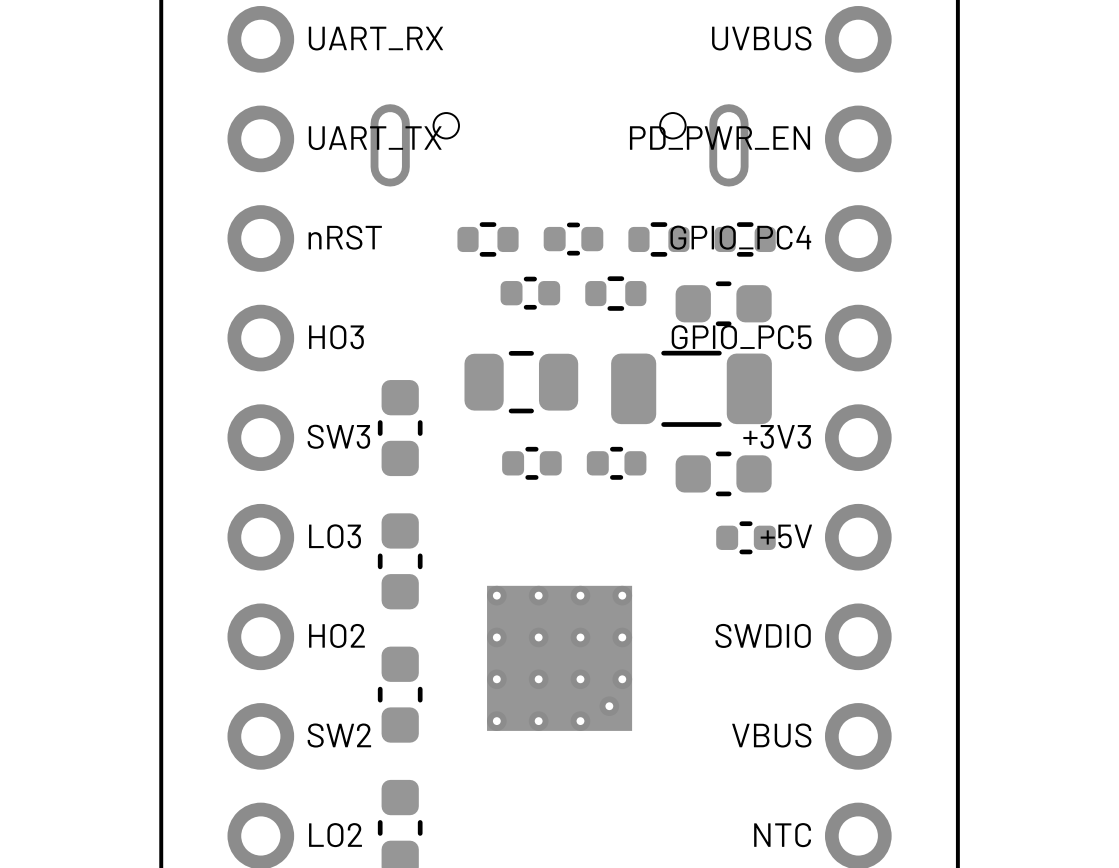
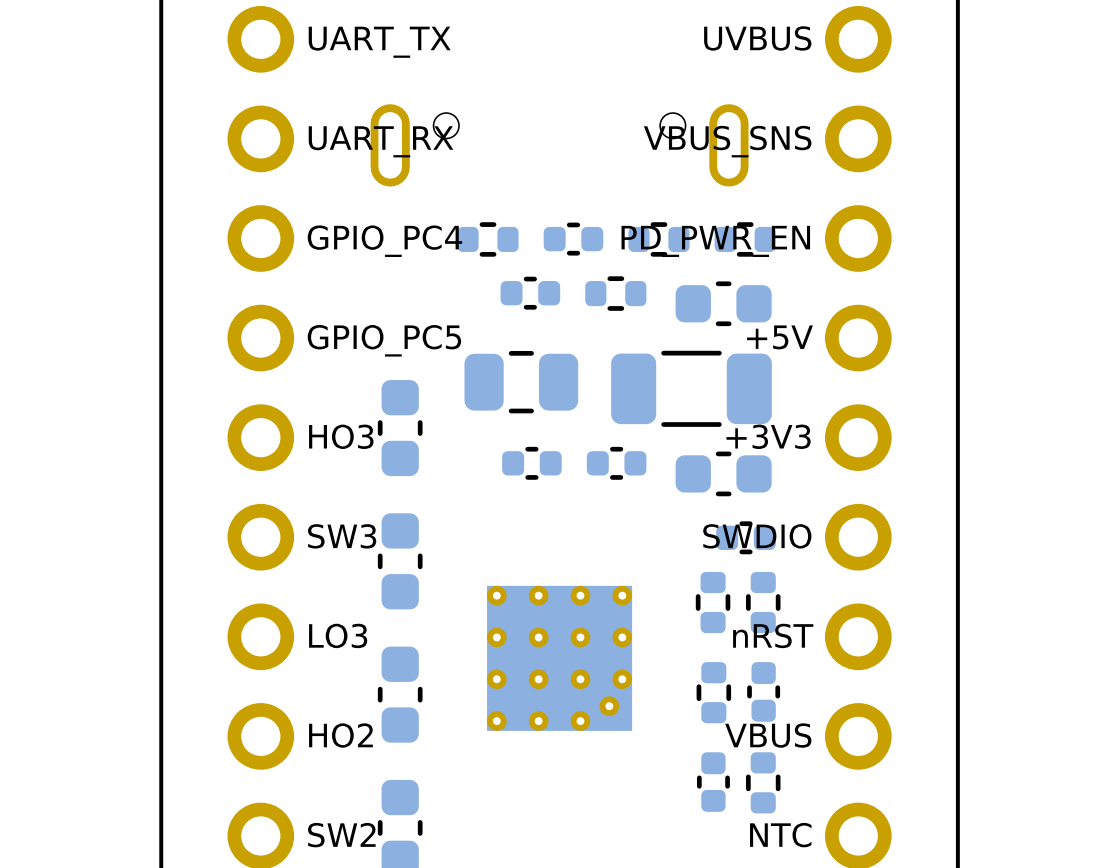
text: UART_RX (375, 38) -> UART_TX (379, 42)
text: UART_TX (375, 138) -> UART_RX (381, 141)
text: PD_PWR_EN (720, 138) -> VBUS_SNS (727, 141)
text: nRST (345, 237) -> GPIO_PC4 (384, 241)
text: GPIO_PC4 (740, 237) -> PD_PWR_EN (715, 241)
text: HO3 (336, 337) -> GPIO_PC5 (384, 340)
text: GPIO_PC5 (741, 337) -> +5V (779, 337)
text: SW3 (338, 436) -> HO3 (341, 436)
text: LO3 (335, 536) -> SW3 (342, 536)
text: +5V (786, 536) -> SWDIO (757, 536)
part: none -> (713, 602)
part: none -> (763, 602)
text: HO2 (336, 635) -> LO3 (338, 635)
text: SWDIO (763, 635) -> nRST (773, 635)
part: none -> (763, 691)
part: none -> (713, 692)
text: SW2 (339, 735) -> HO2 (340, 735)
part: none -> (713, 782)
part: none -> (763, 782)
text: LO2 (335, 835) -> SW2 (341, 835)

